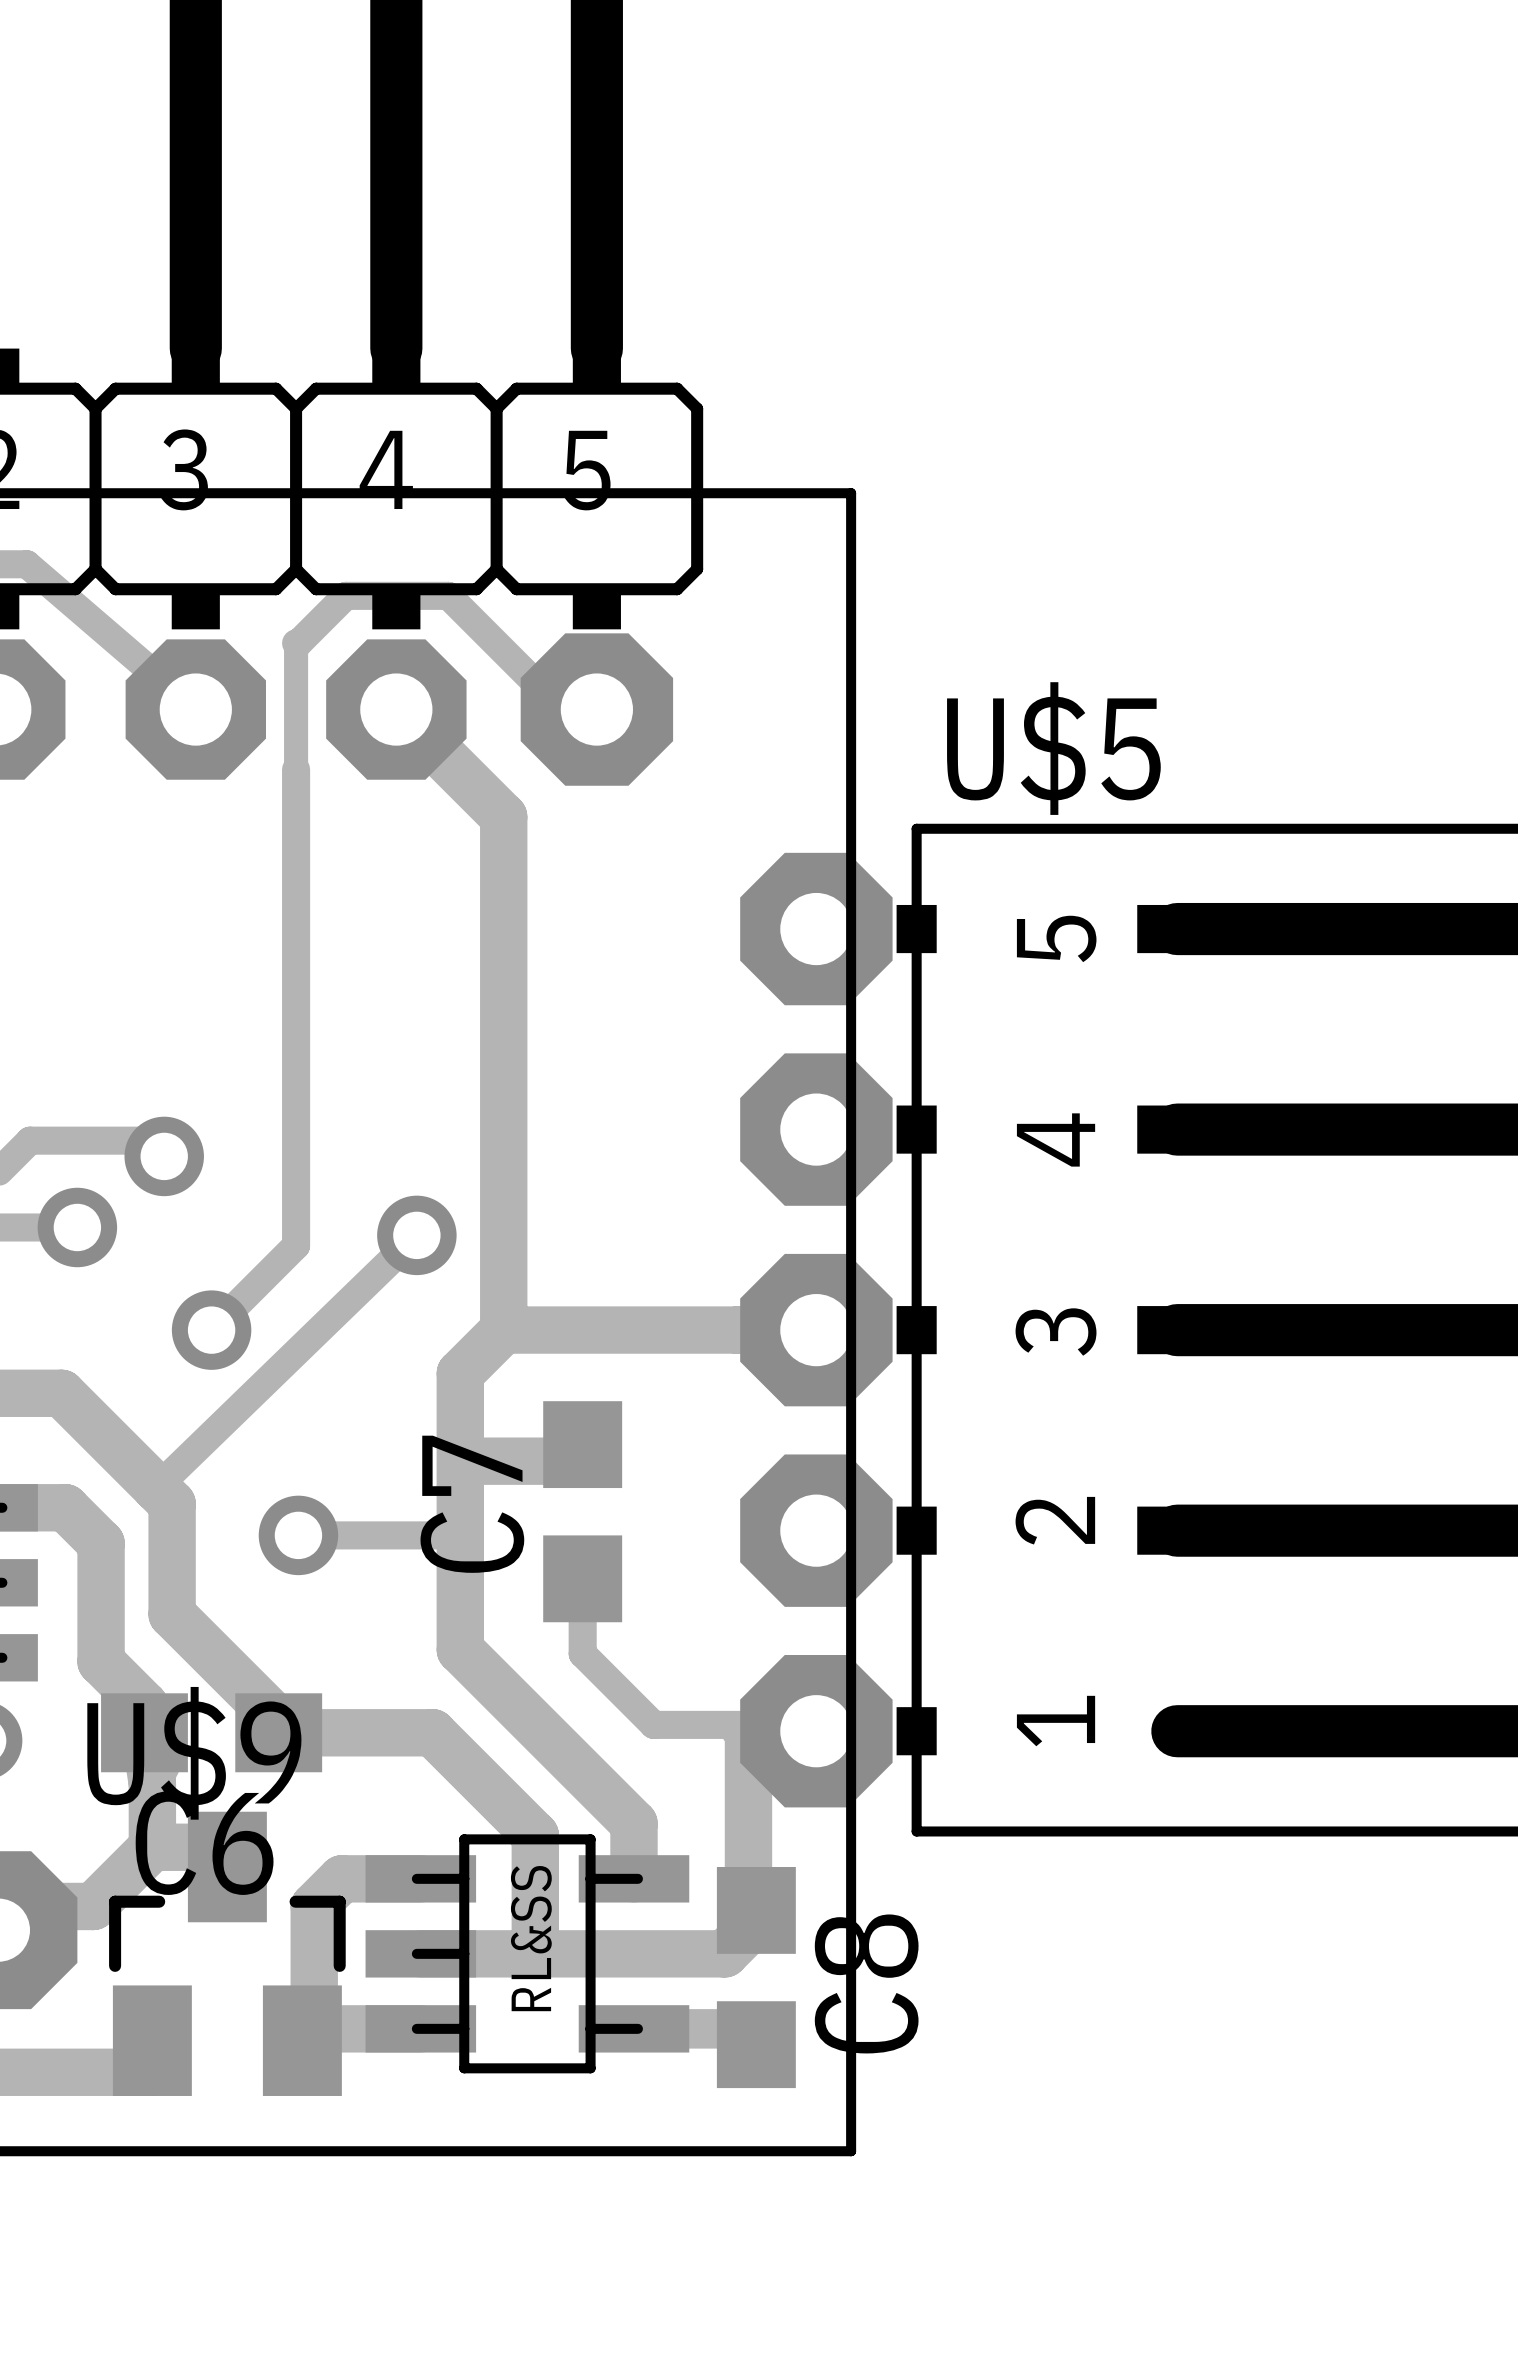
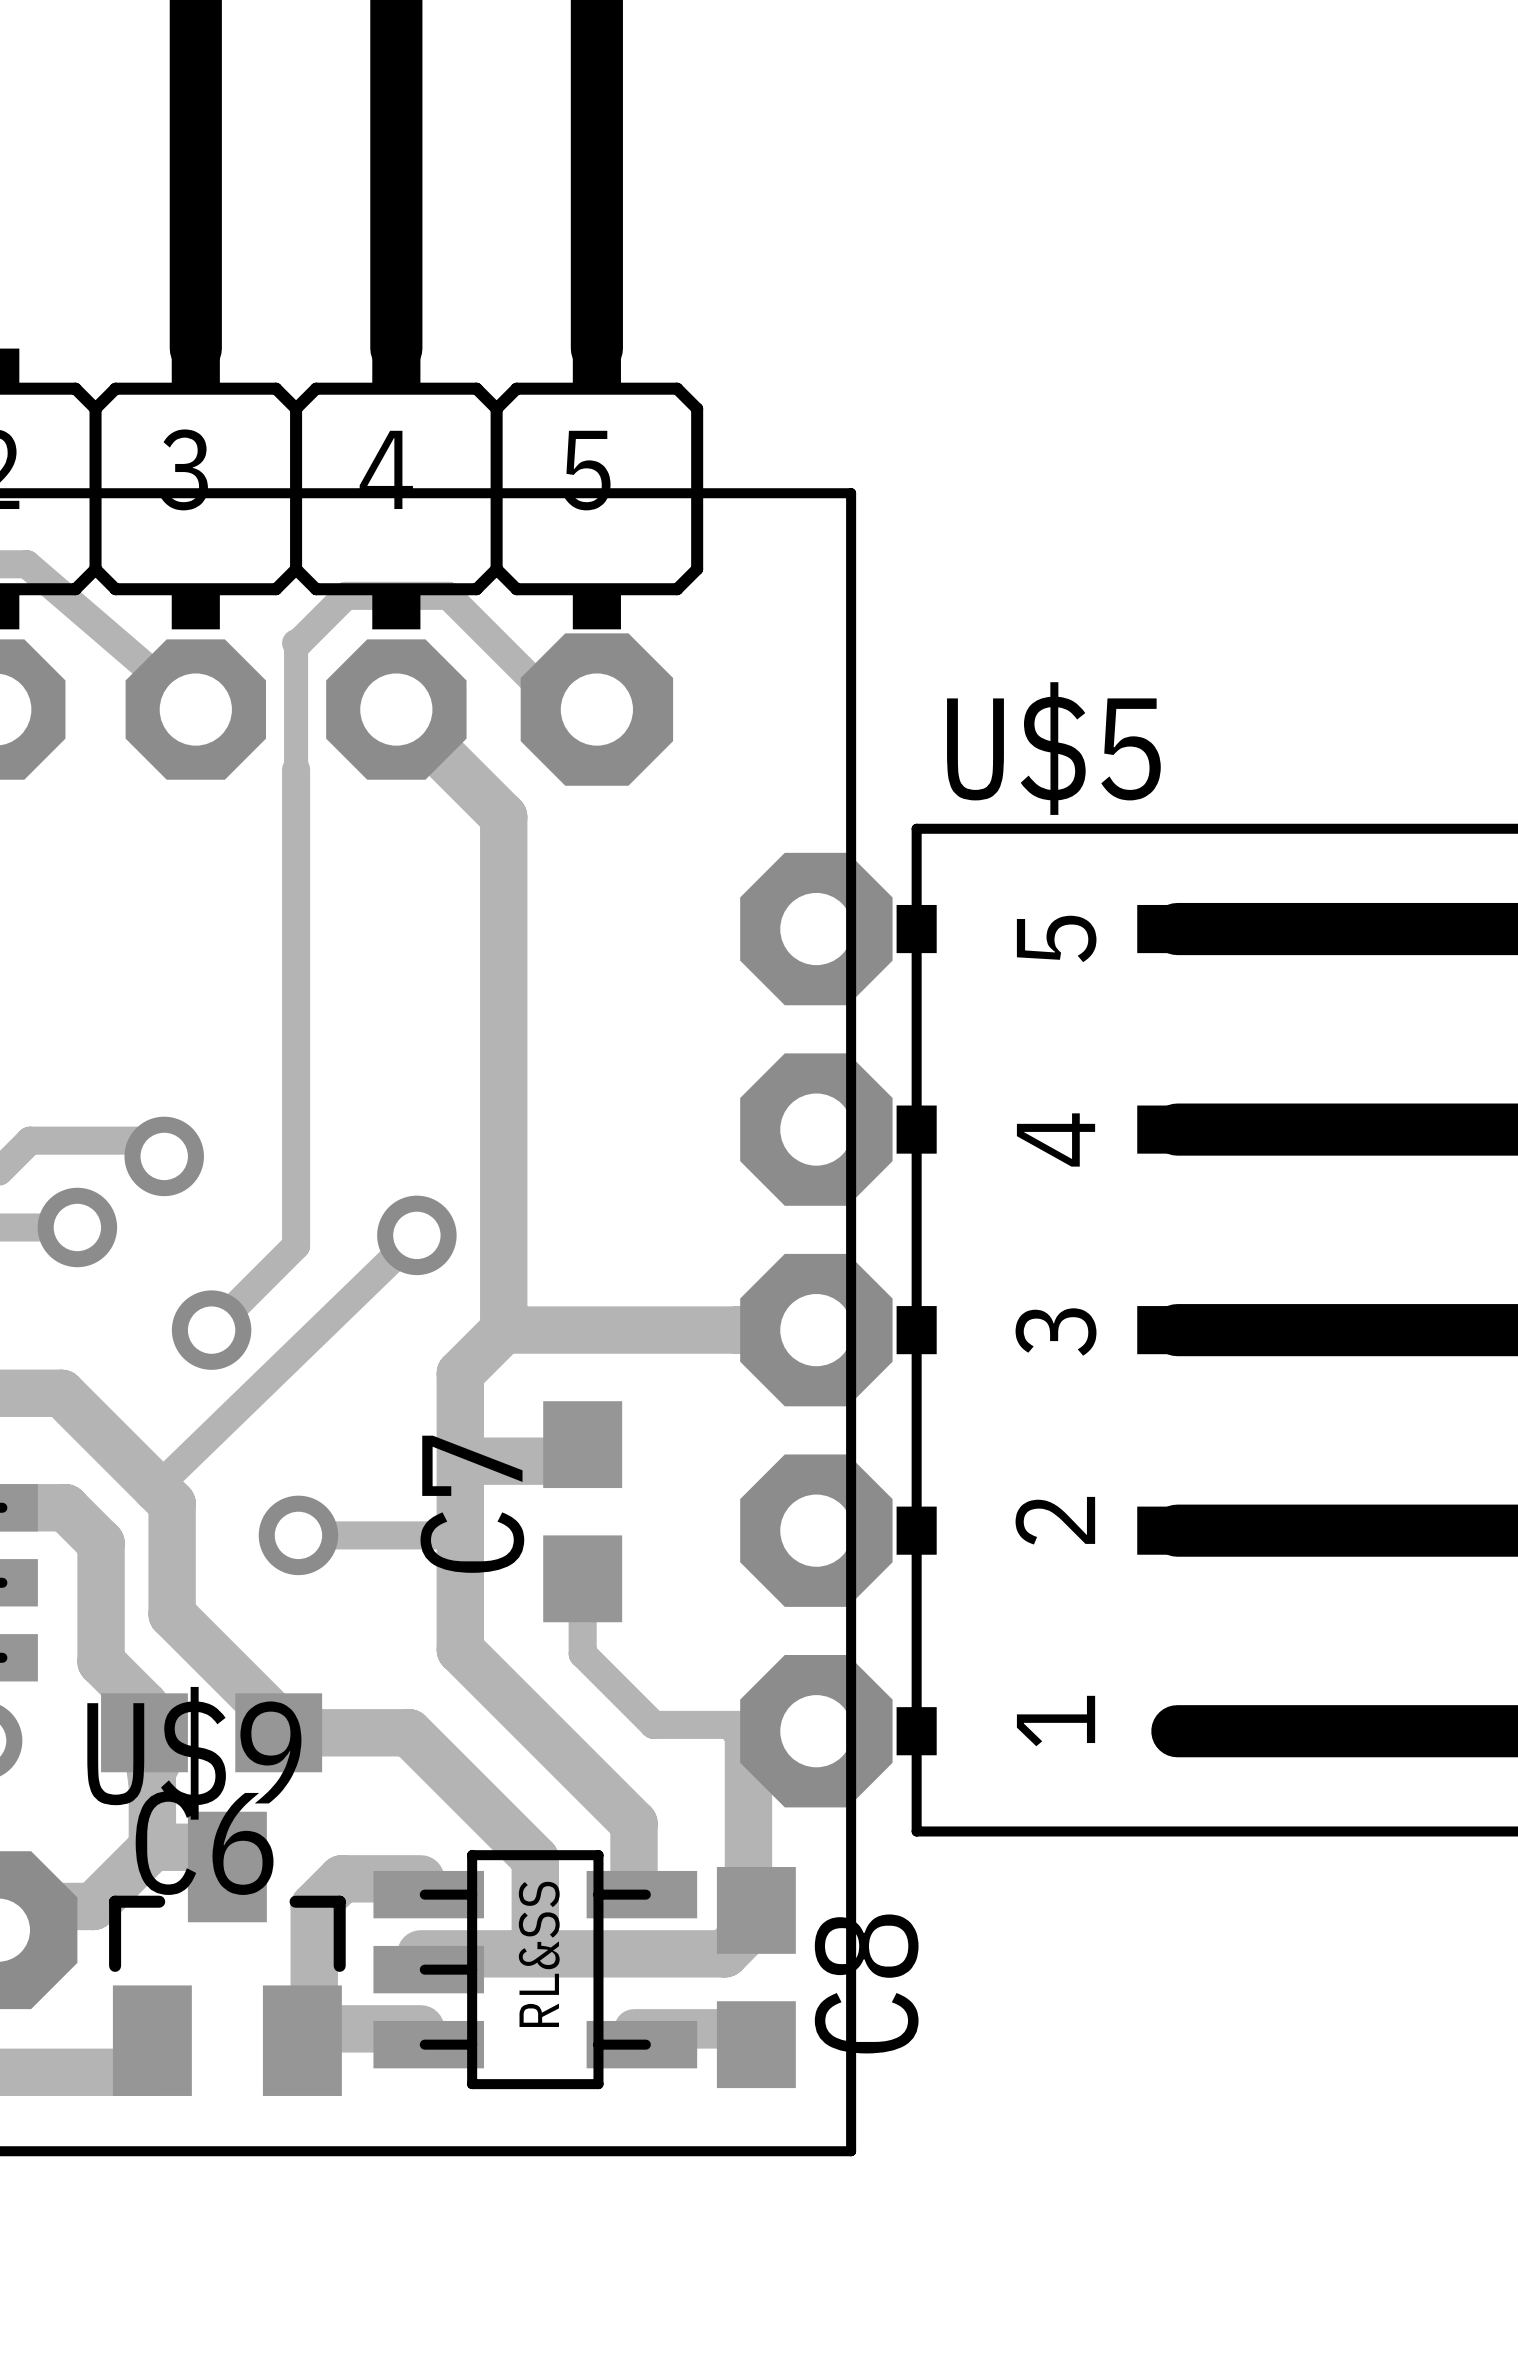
track: (408, 1732) (432, 1732) (535, 1835) (535, 1859) -> (408, 1732) (535, 1859)
part position: (527, 1953) -> (535, 1969)

